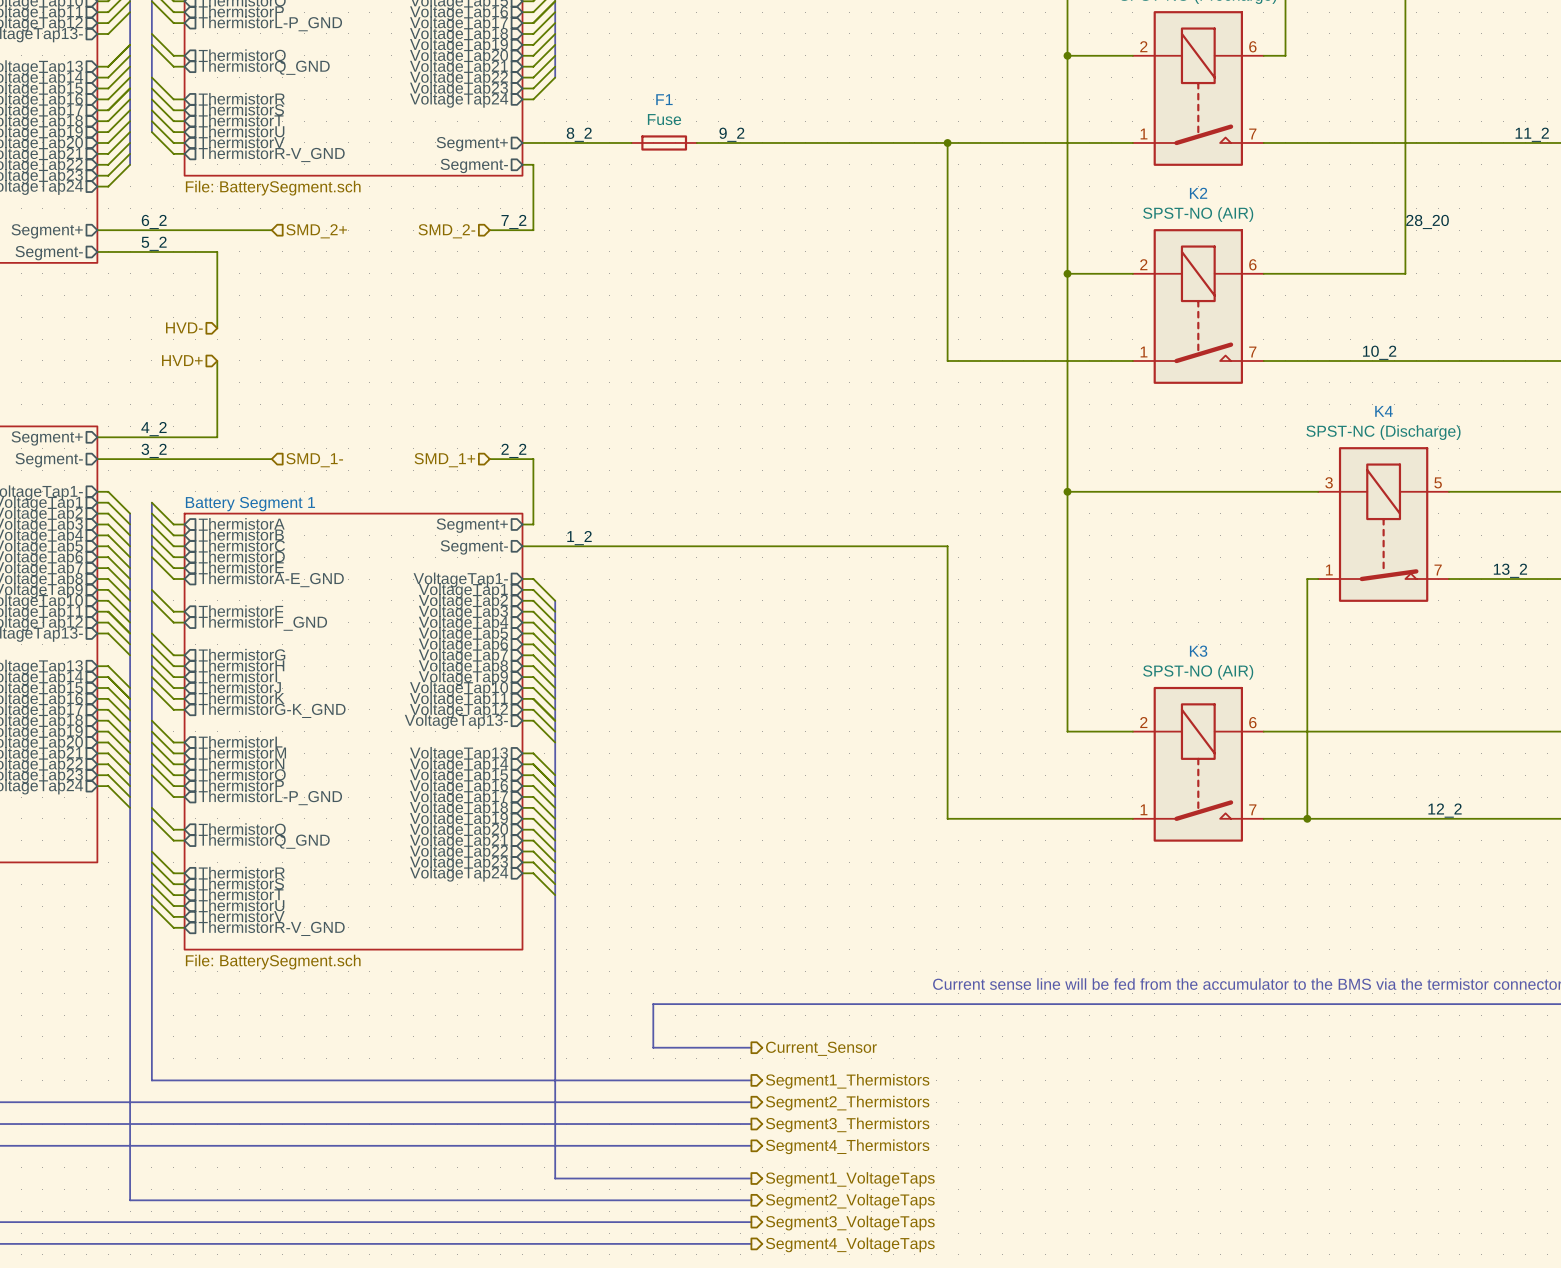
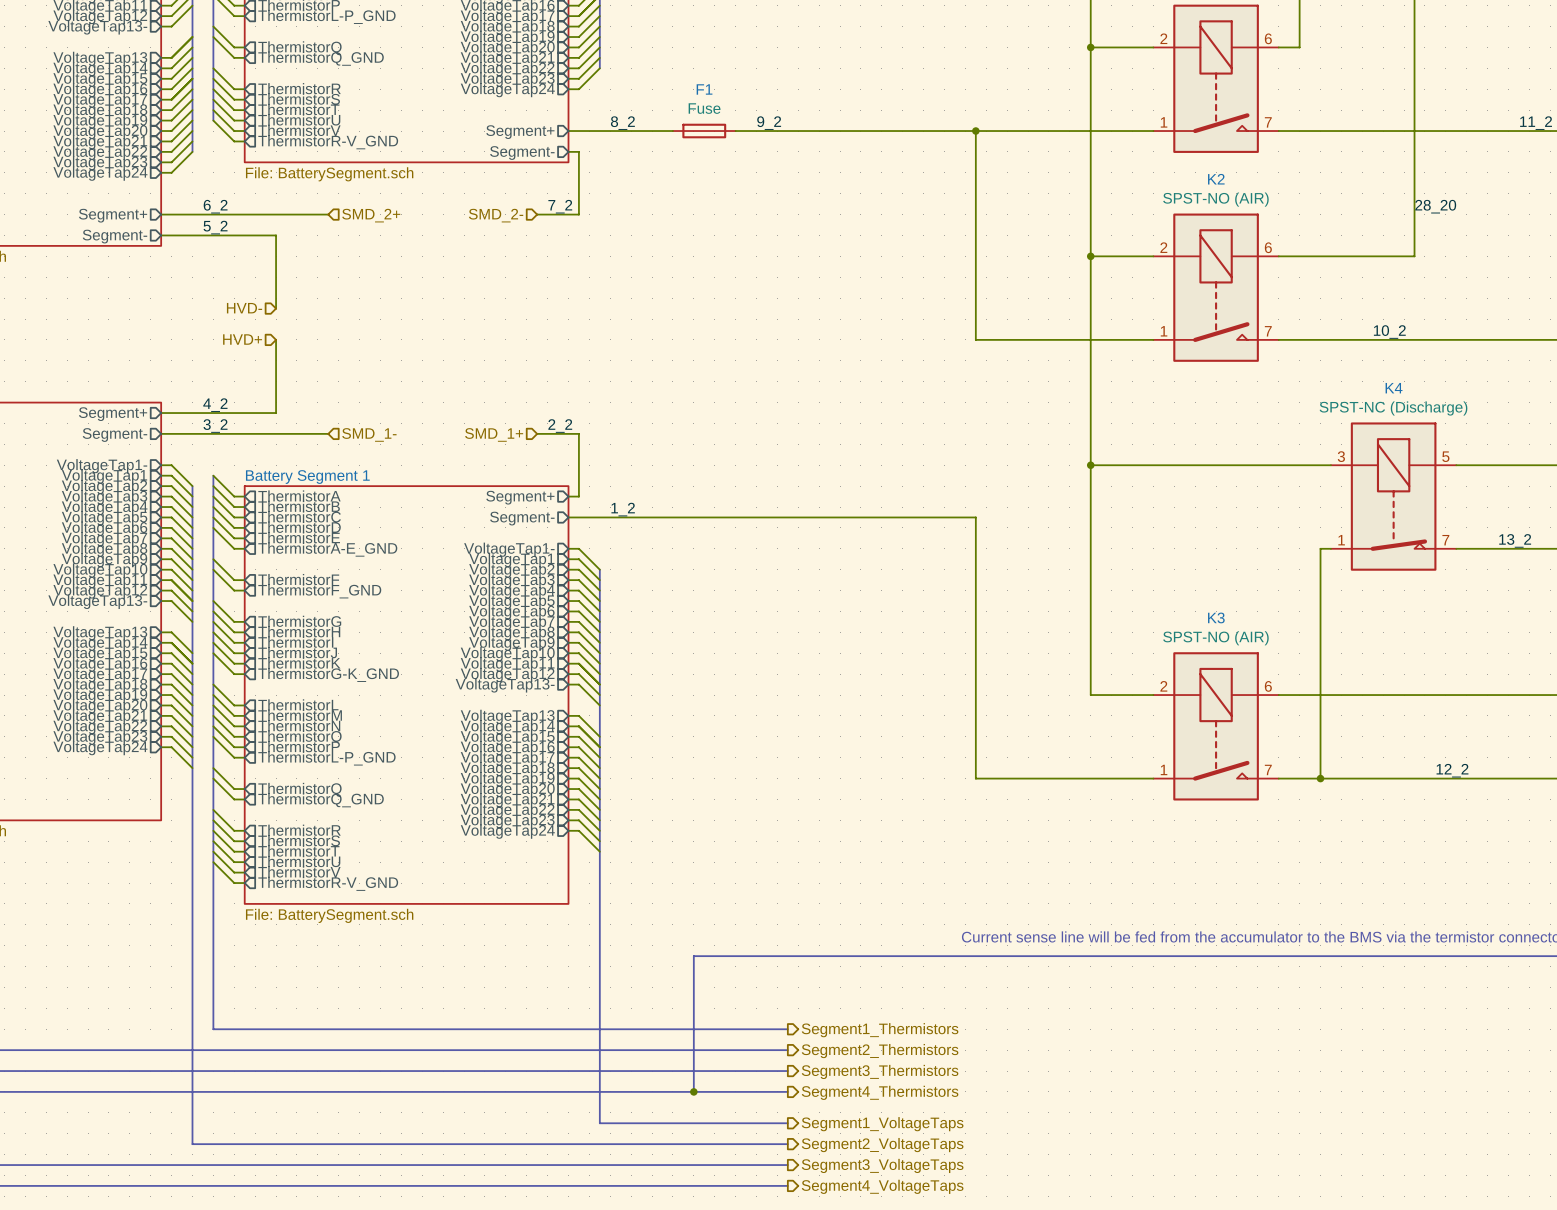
bus: (653, 1047) (751, 1047) -> (693, 997) (693, 1091)
hierarchical label: Current_Sensor (821, 1048) -> none
junction: none -> (693, 1091)

